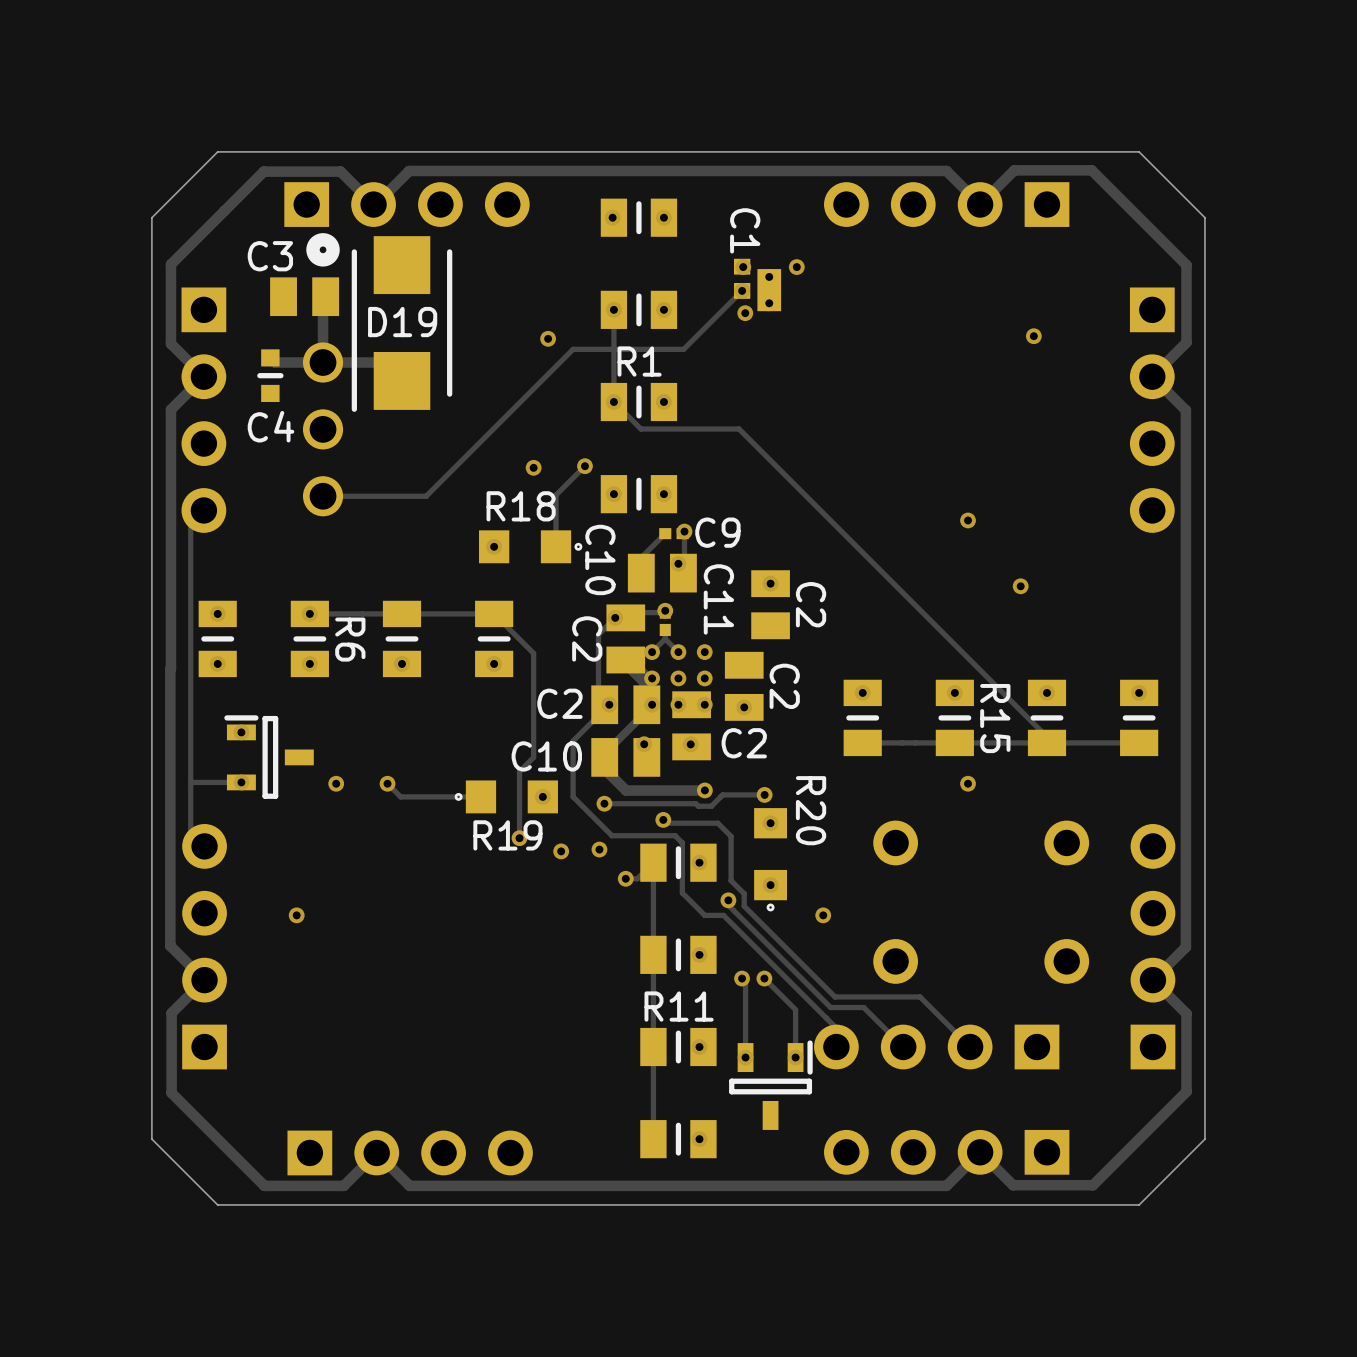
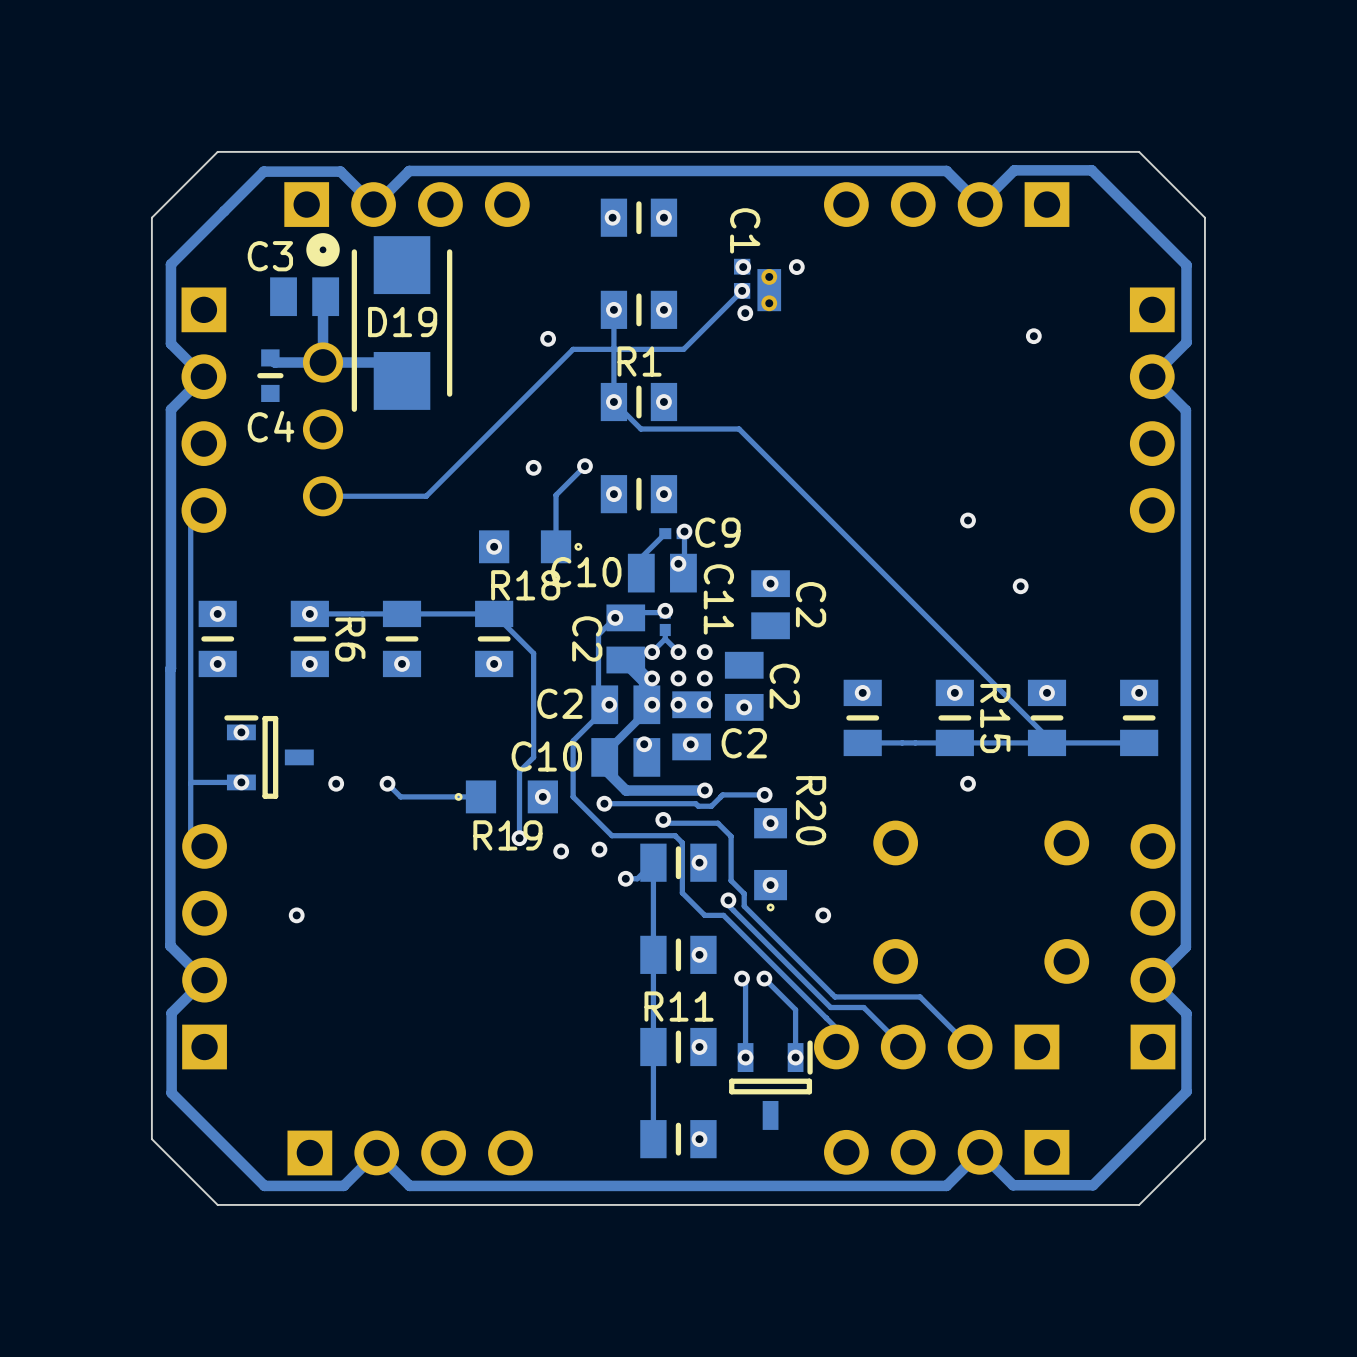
R18 name position: R18 (521, 506) -> R18 (525, 585)
C10 name rotation: 0° (600, 559) -> 90° counterclockwise (586, 572)

